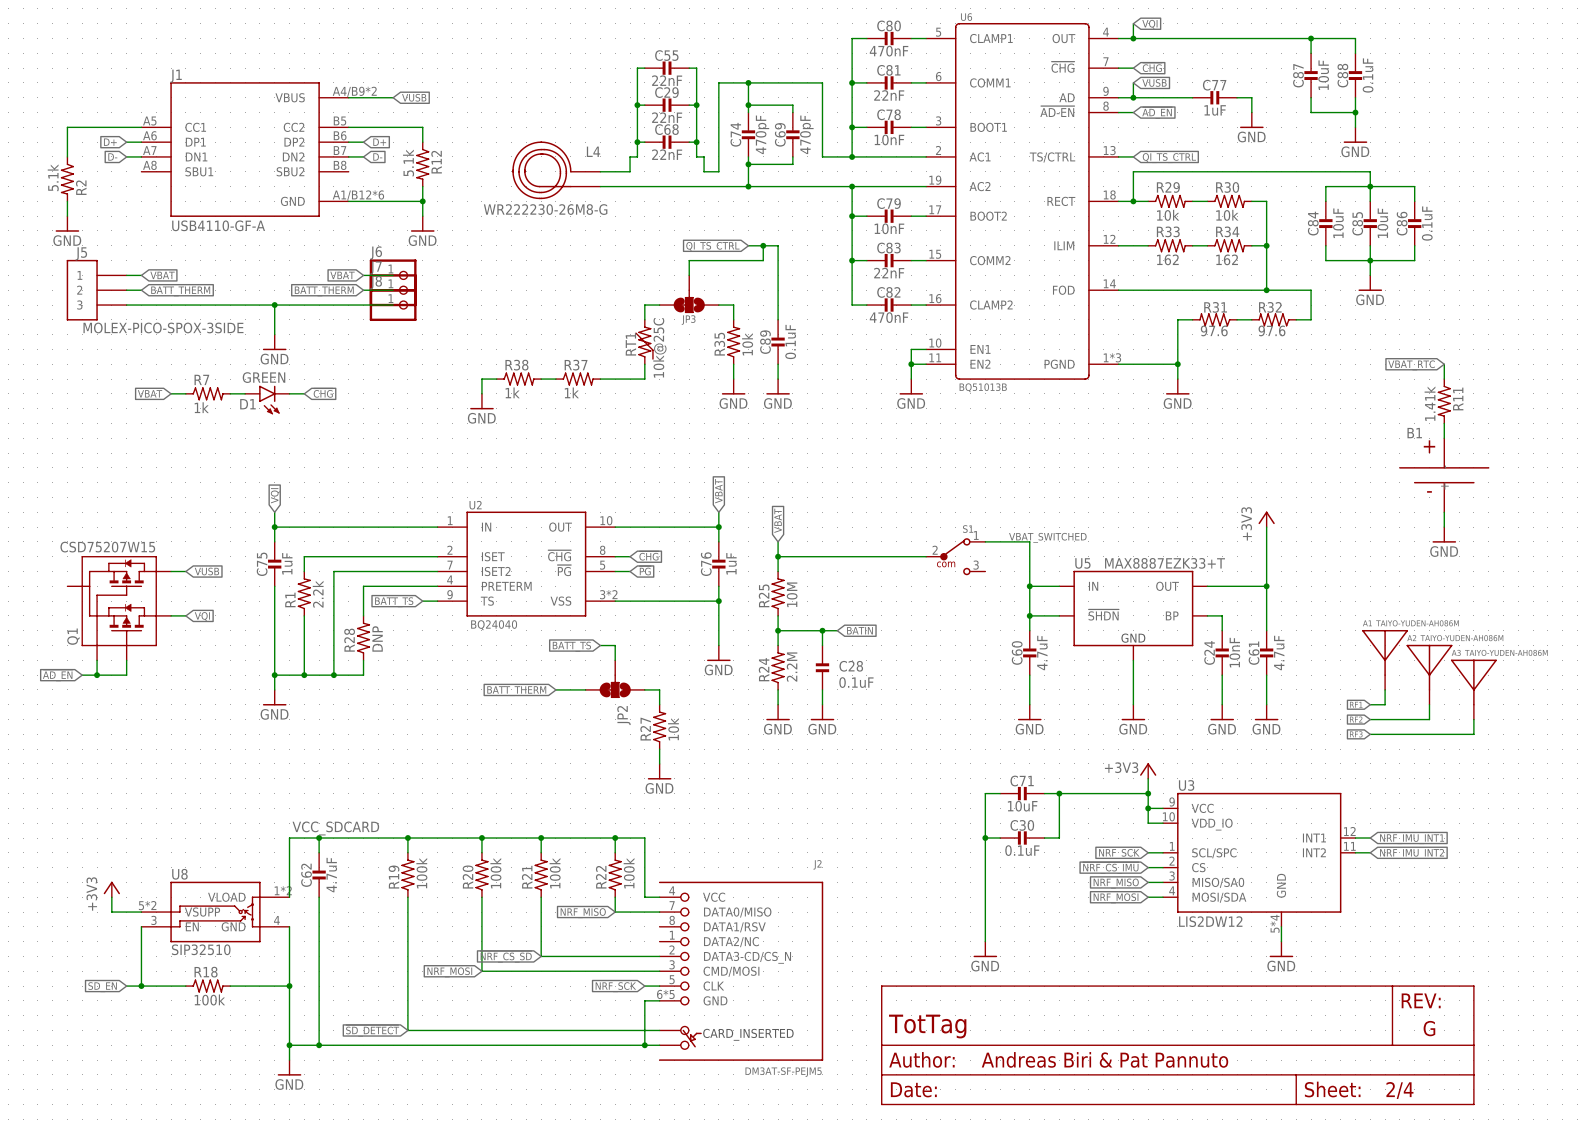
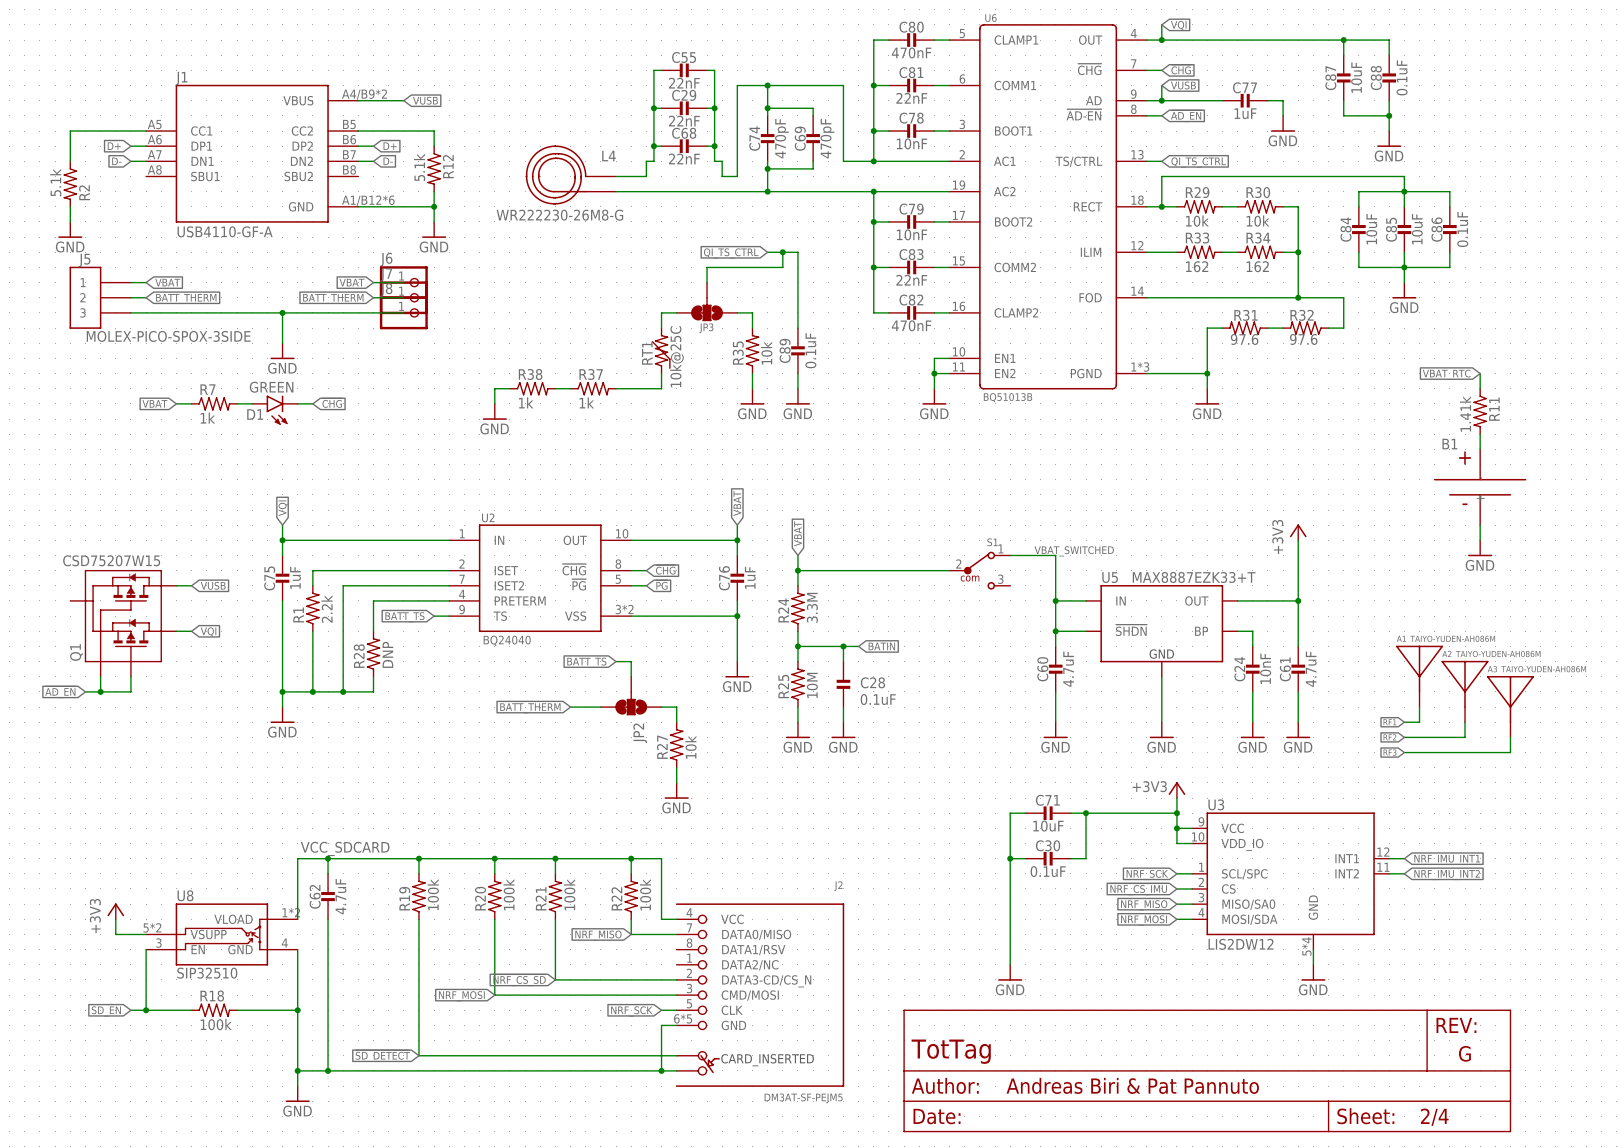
R25 value: 10M (792, 594) -> 3.3M (812, 607)
R25 name: R25 (764, 595) -> R24 (783, 610)
R24 value: 2.2M (792, 667) -> 10M (812, 685)
R24 name: R24 (764, 669) -> R25 (783, 686)

